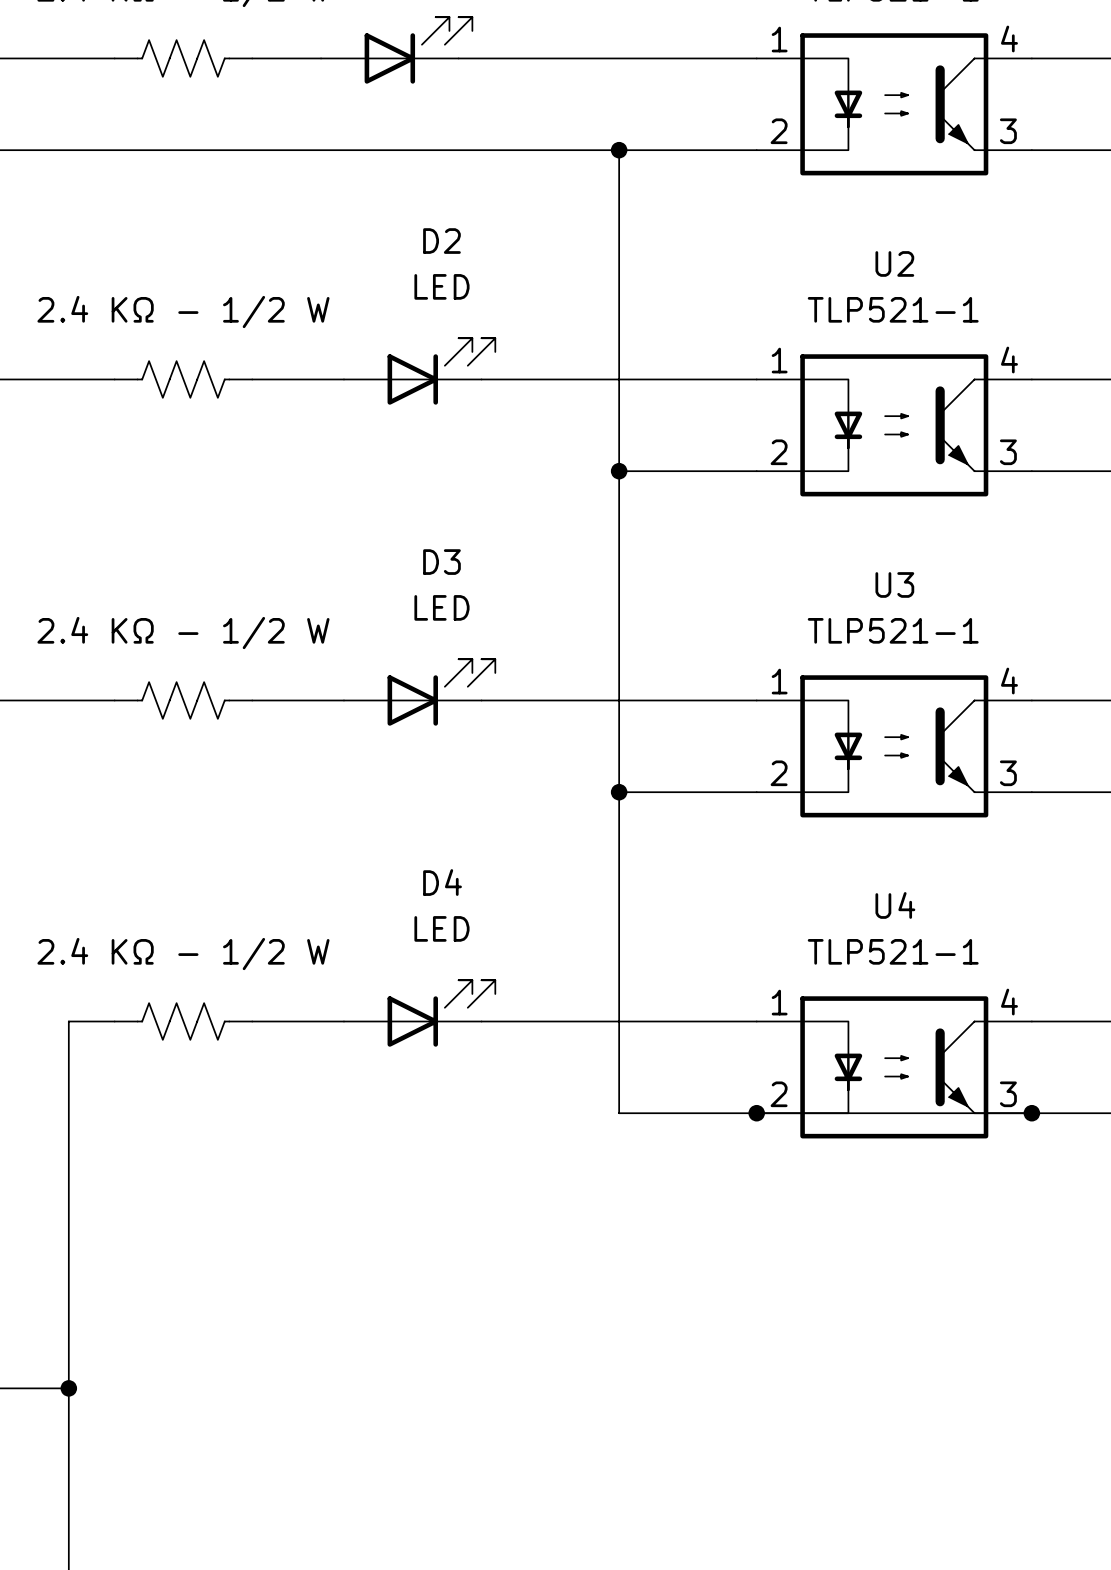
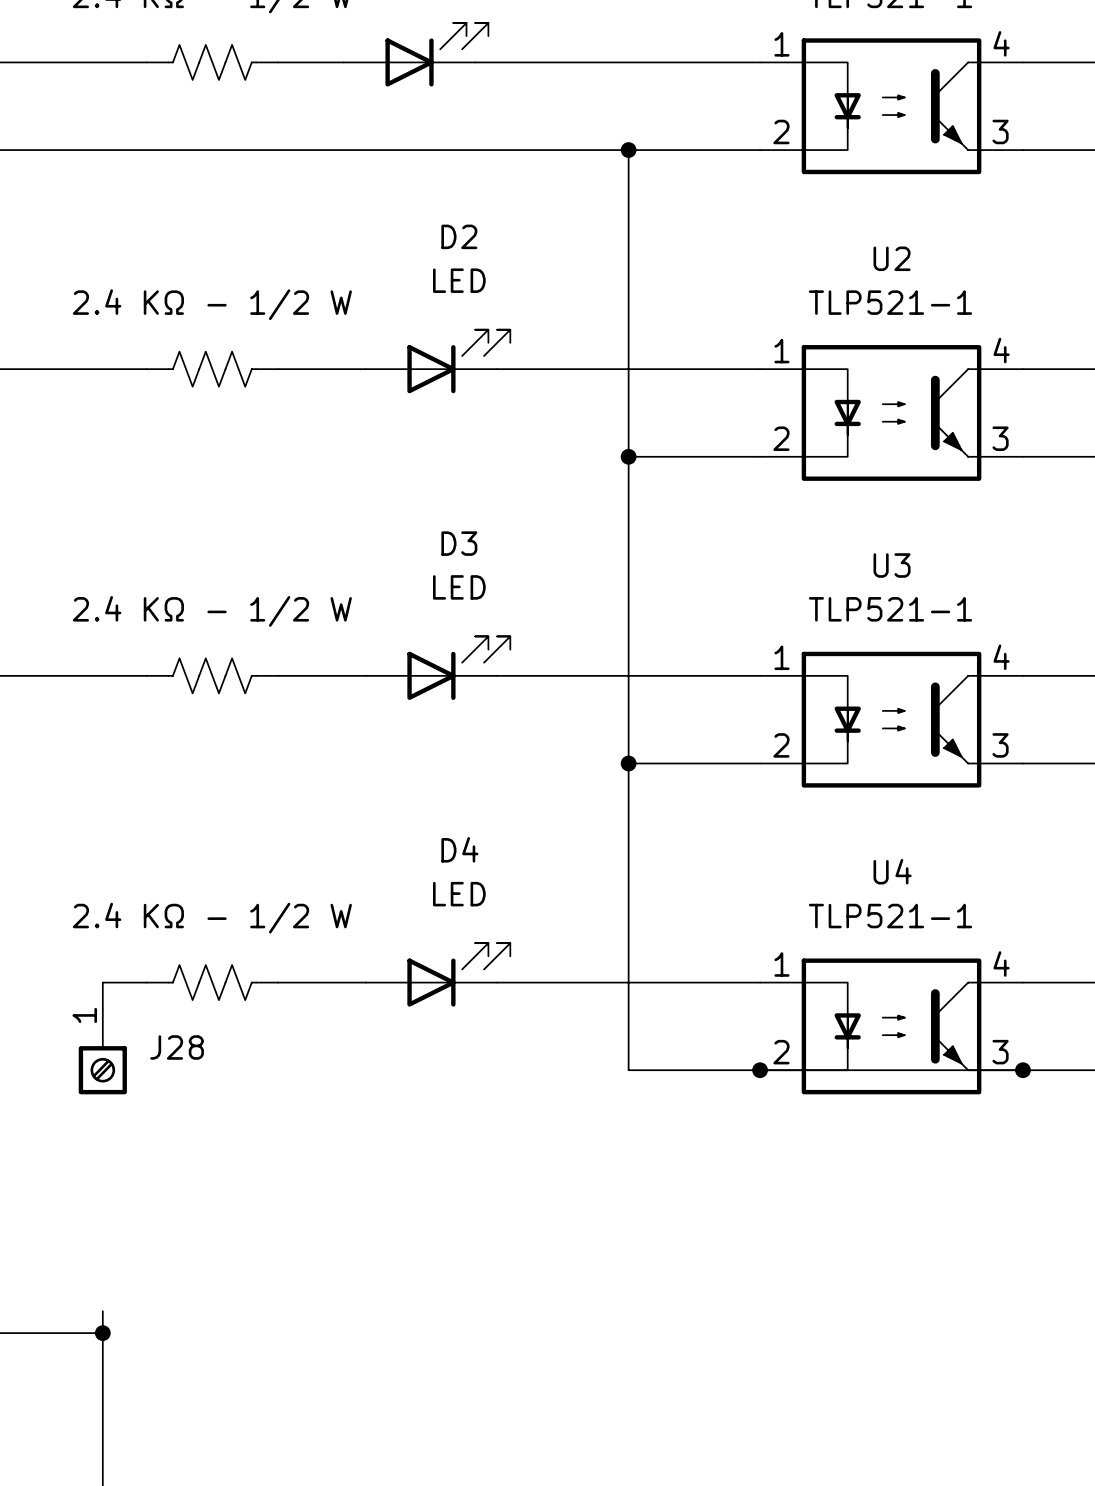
wire: (68, 1021) (68, 1365) -> none
J28: none -> (102, 1038)

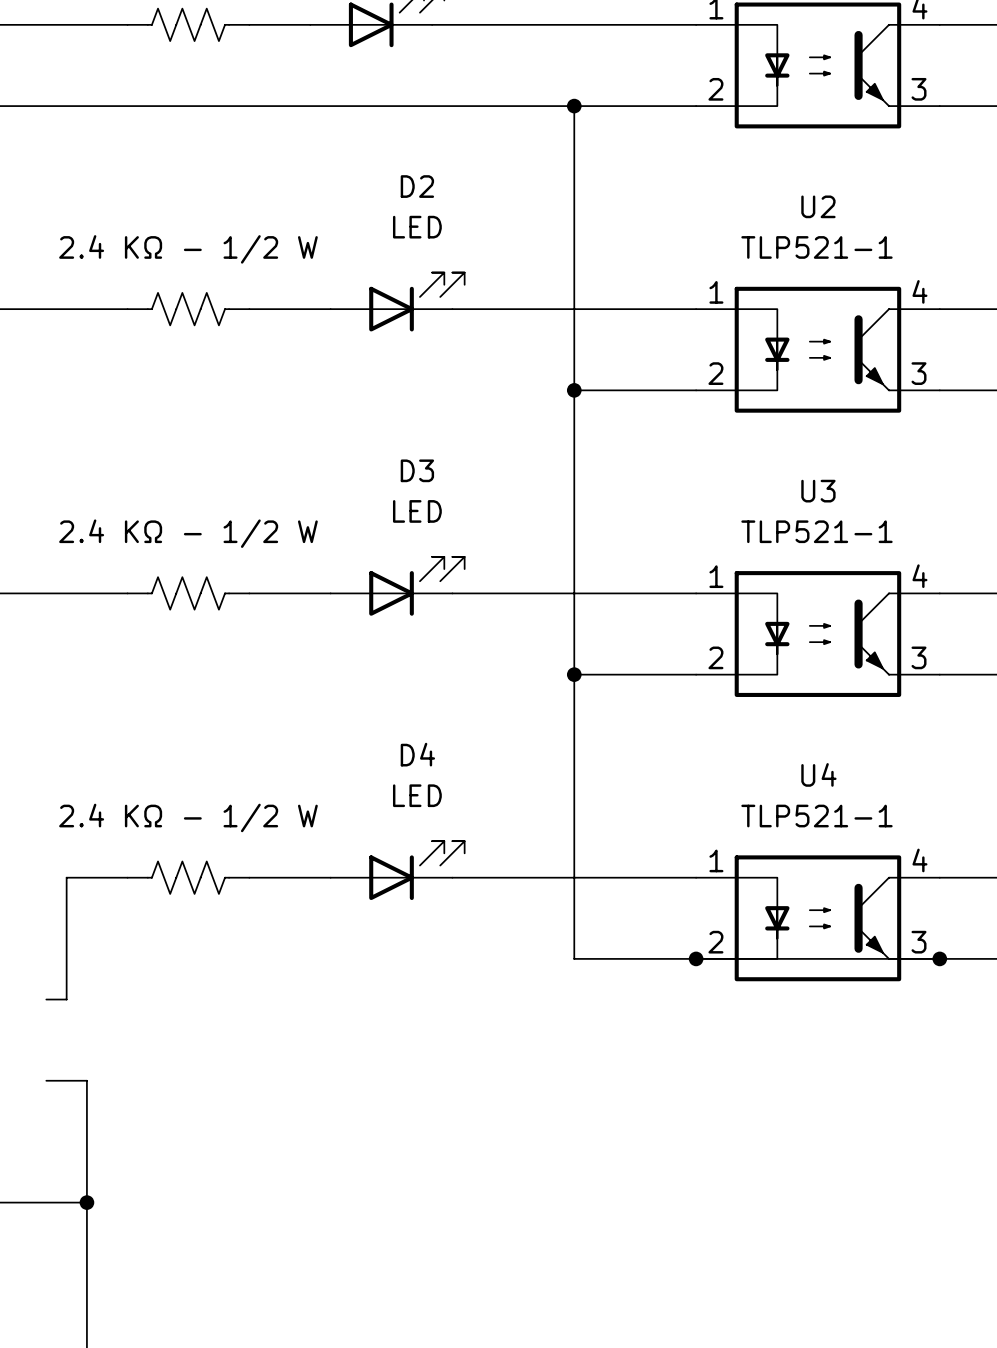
wire: none -> (86, 877) (66, 877) (66, 999) (46, 999)
J28: (102, 1038) -> none
wire: none -> (46, 1080) (86, 1080) (86, 1182)

